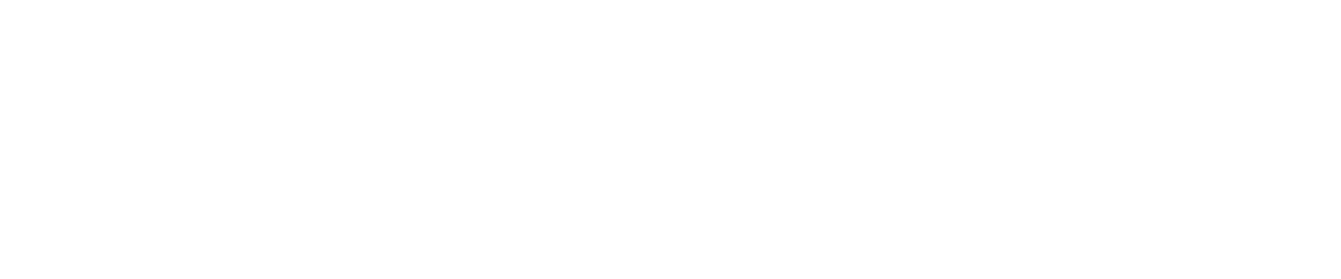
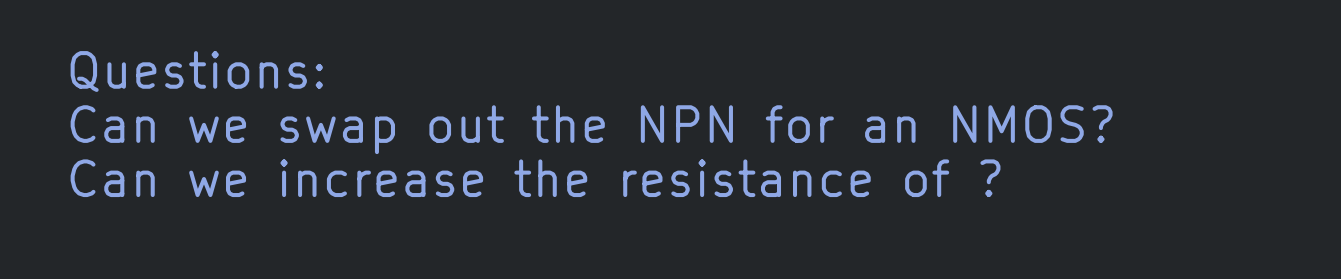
text: none -> Questions: (196, 71)
text: none -> Can we swap out the NPN for an NMOS? (591, 129)
text: none -> Can we increase the resistance of ? (535, 178)

